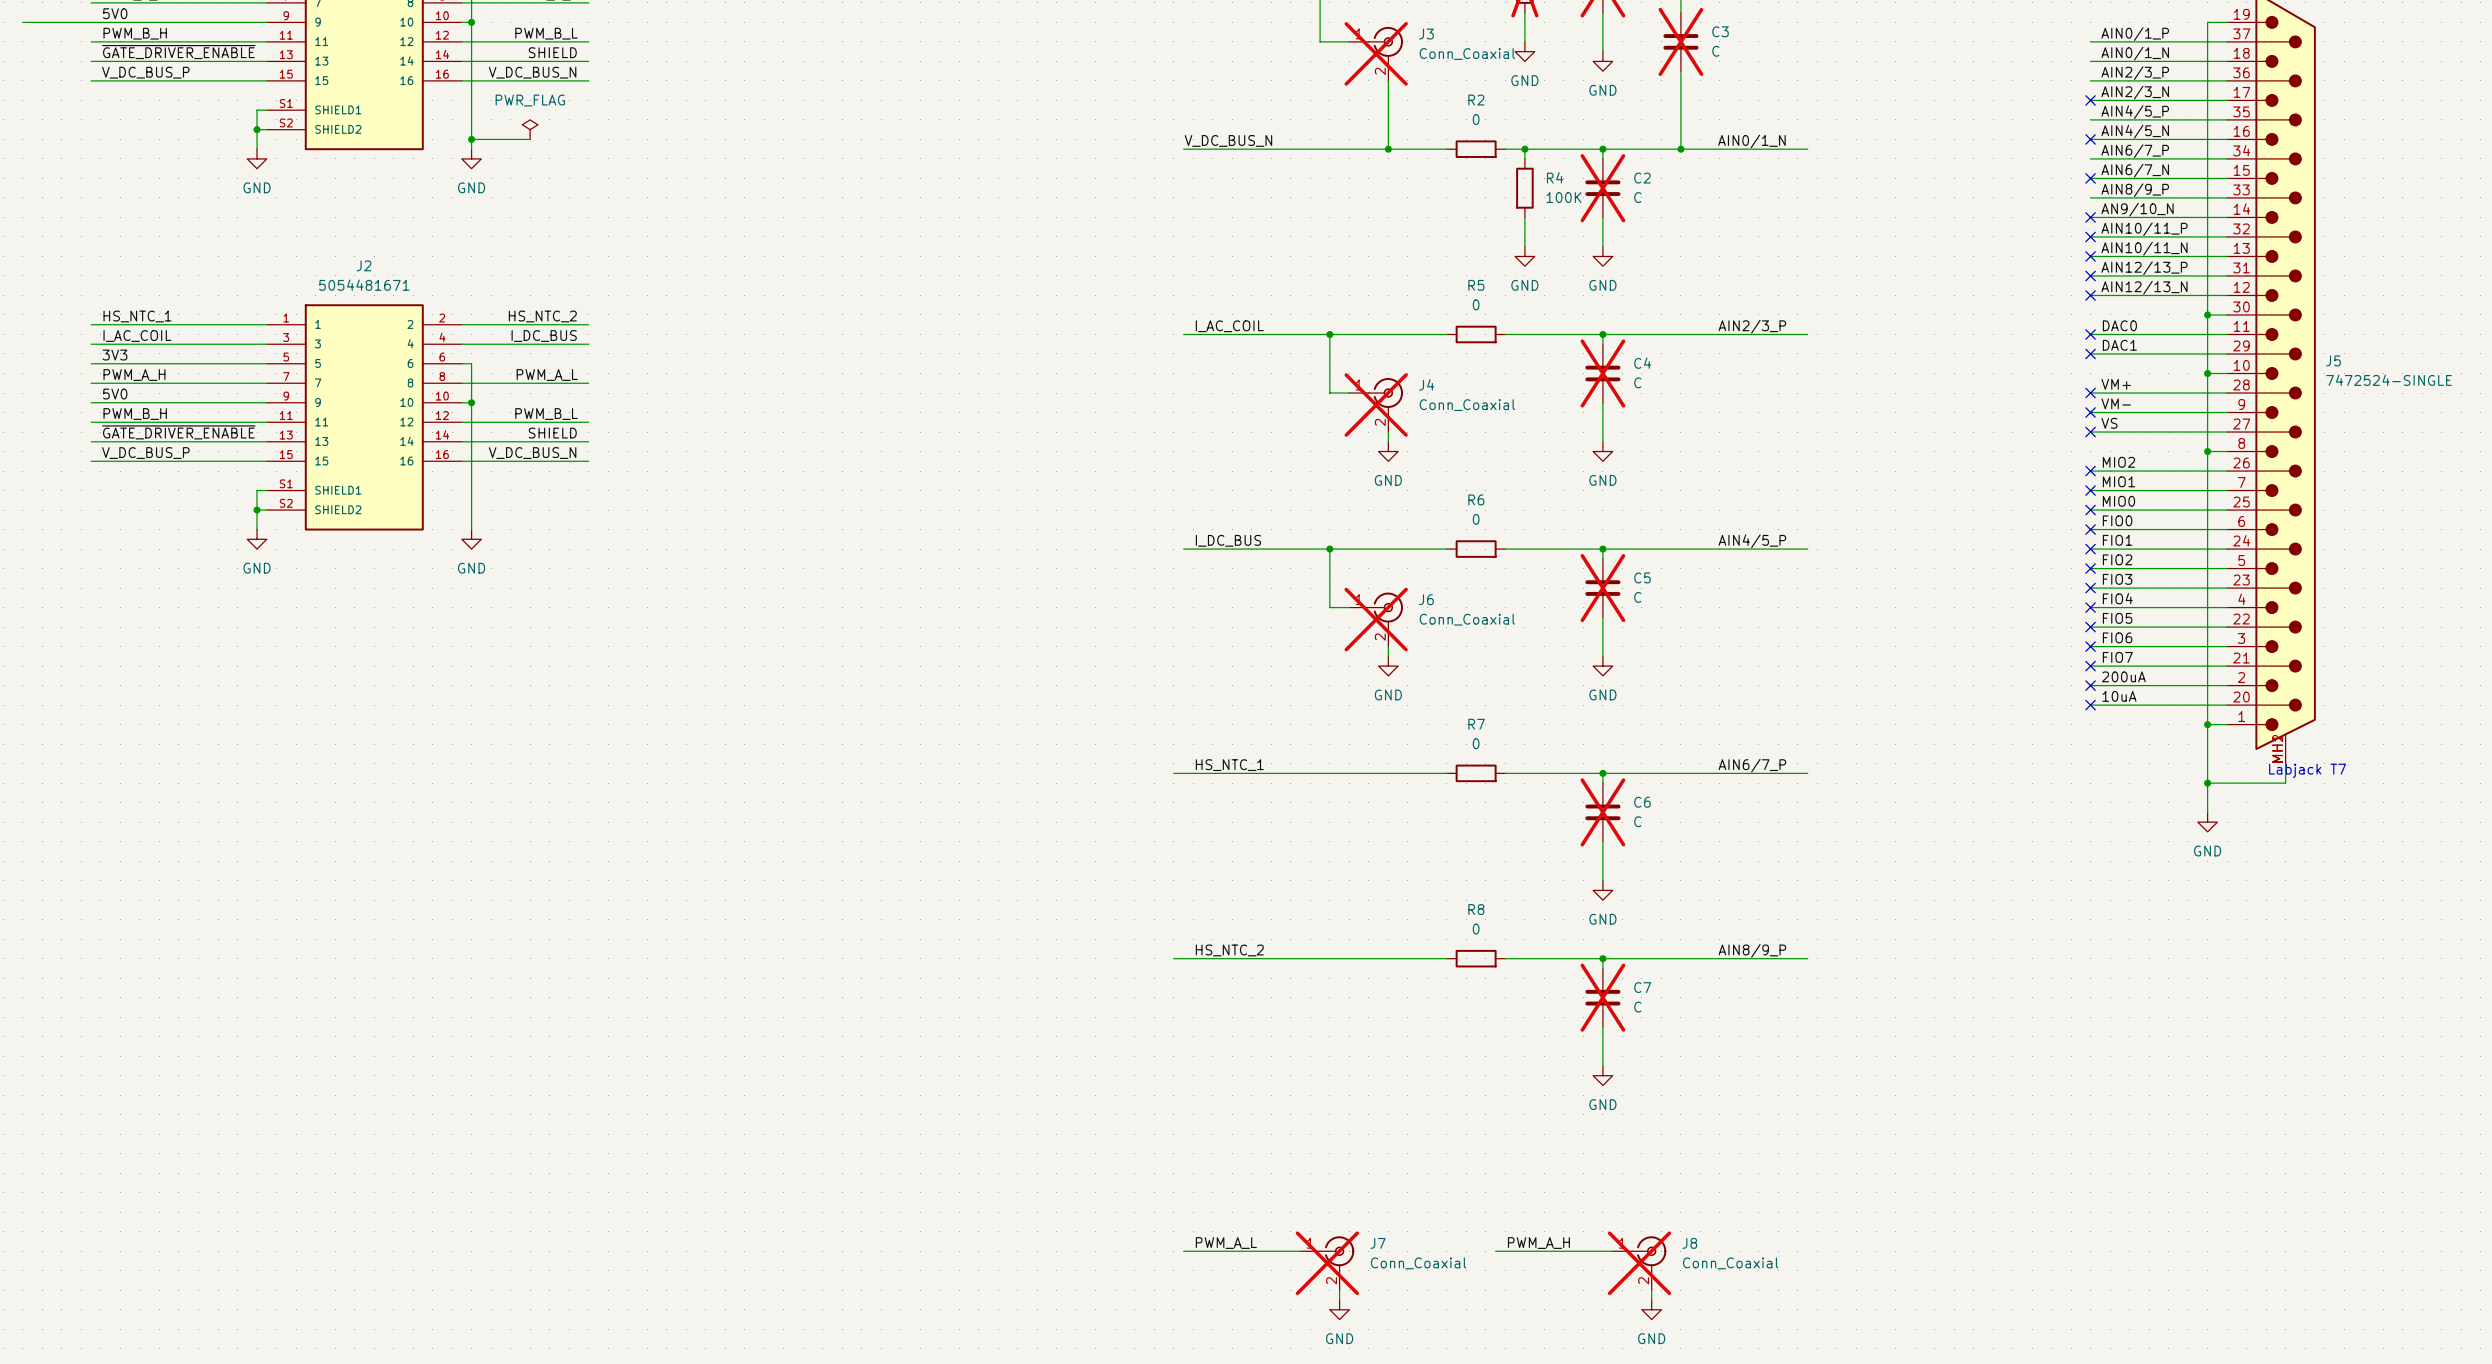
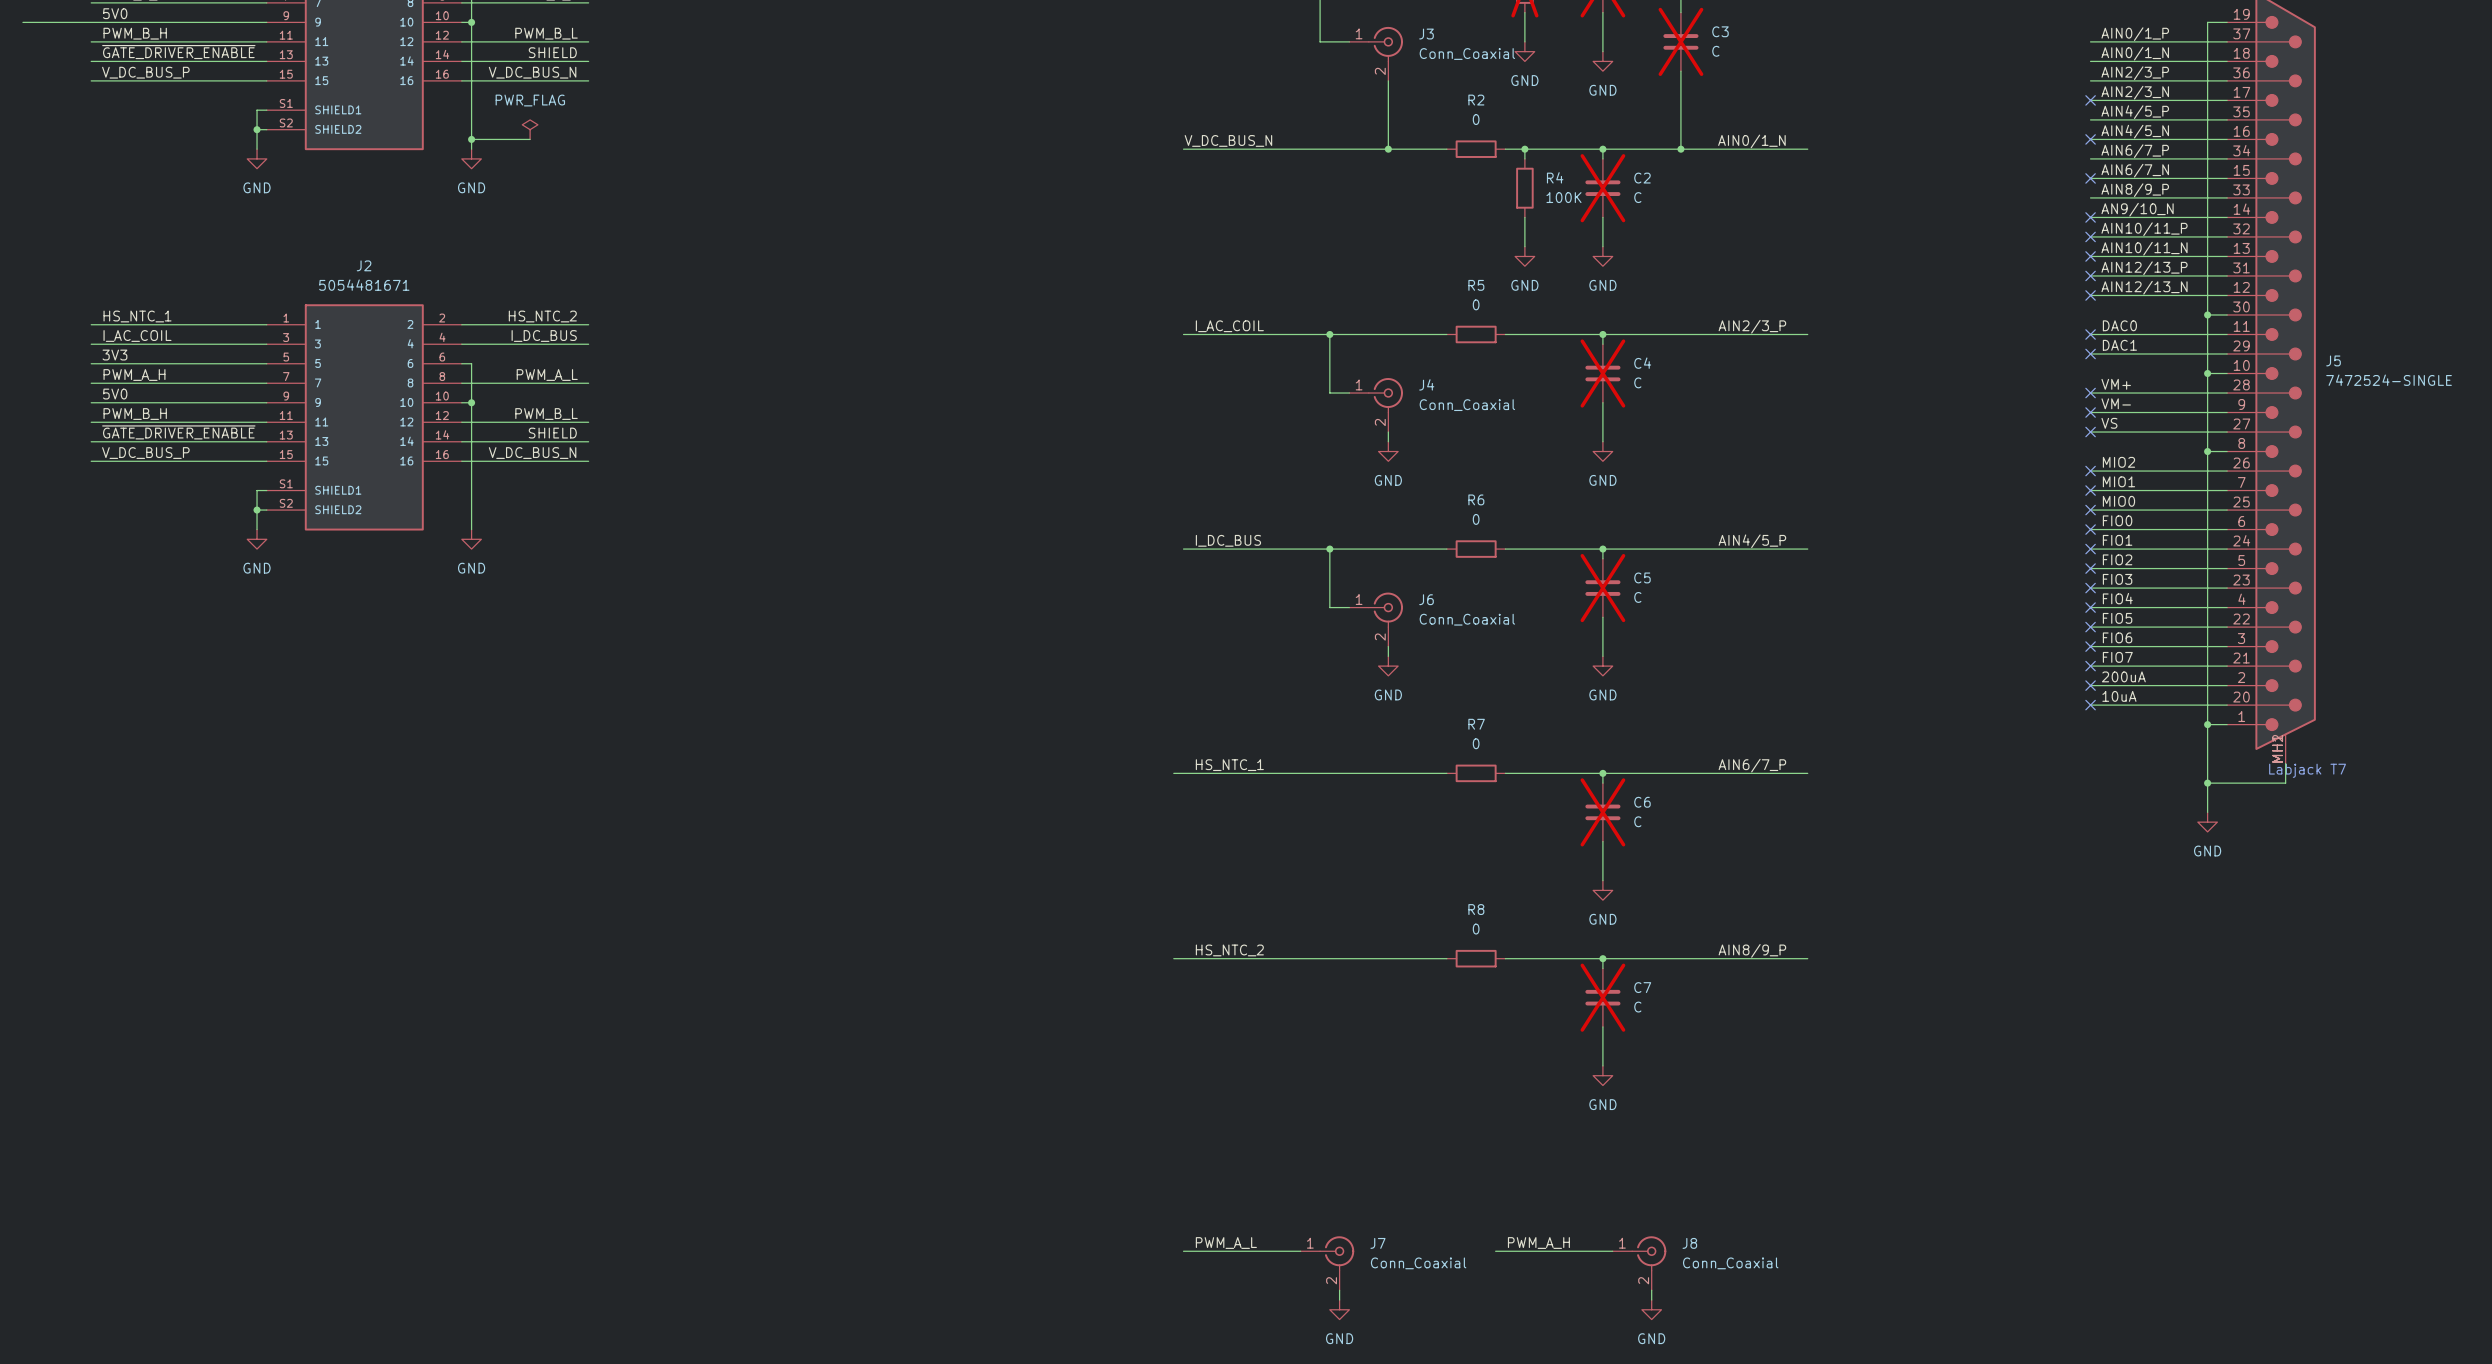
J3 do-not-place cross: (1376, 53) -> none
J4 do-not-place cross: (1376, 405) -> none
J6 do-not-place cross: (1376, 619) -> none
J7 do-not-place cross: (1327, 1263) -> none
J8 do-not-place cross: (1639, 1263) -> none

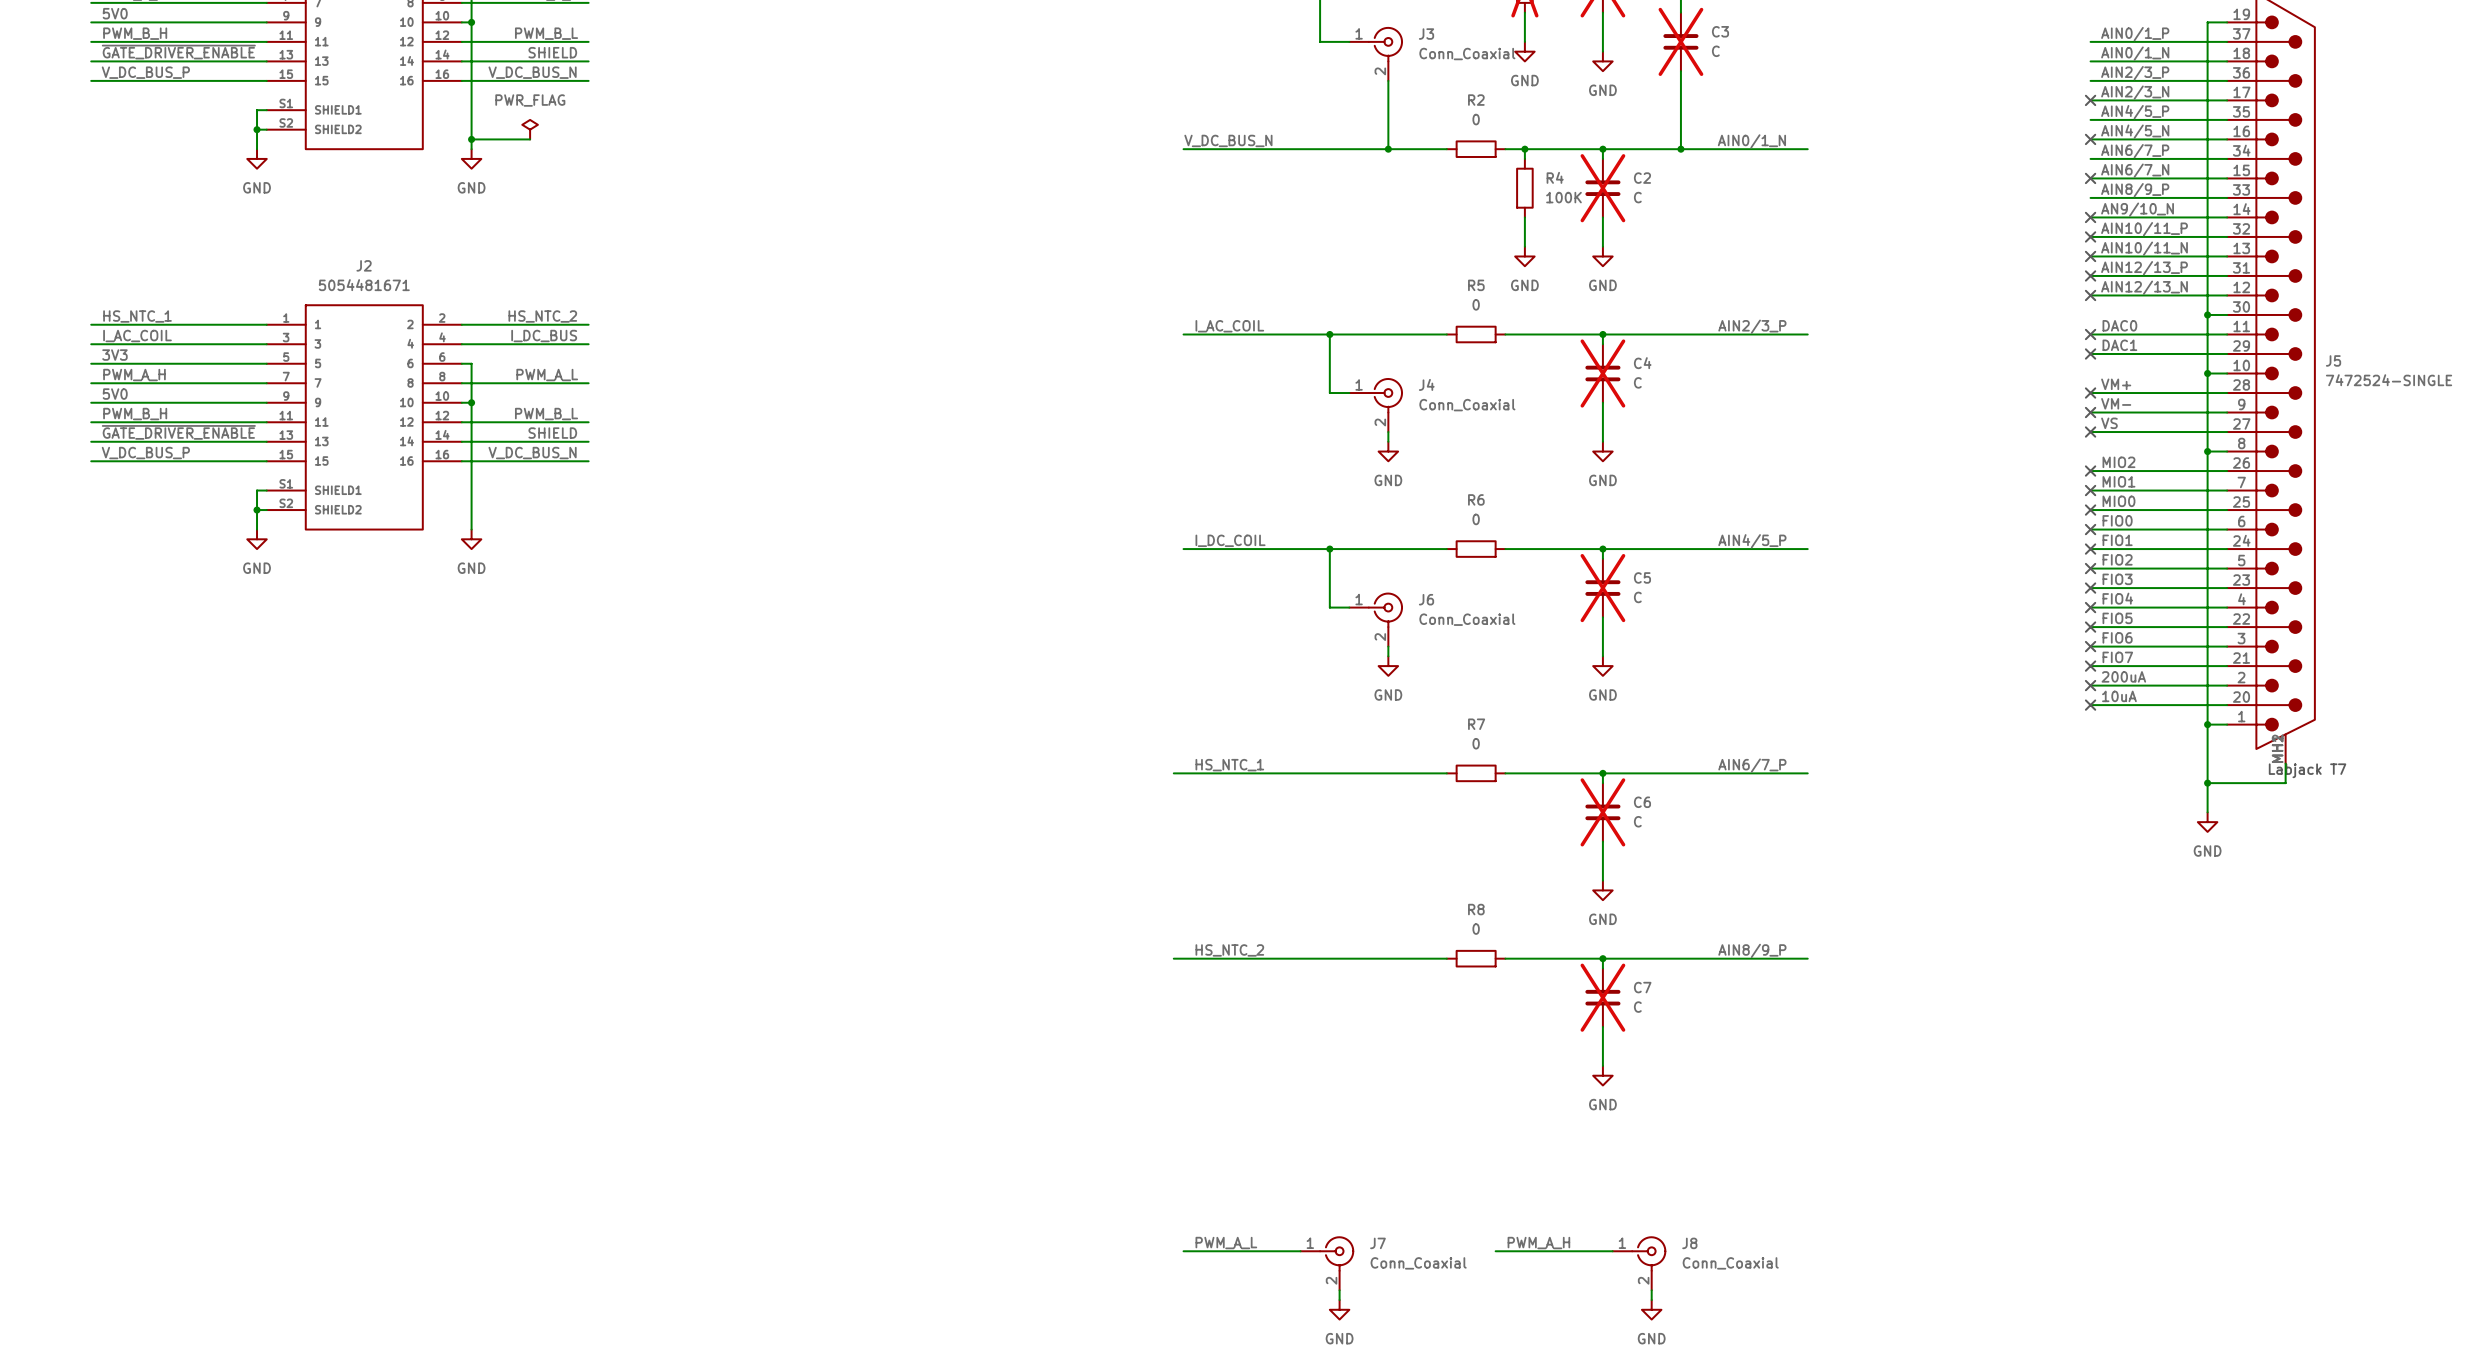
wire: (22, 22) (91, 22) -> none
label: I_DC_BUS (1228, 540) -> I_DC_COIL (1230, 540)

